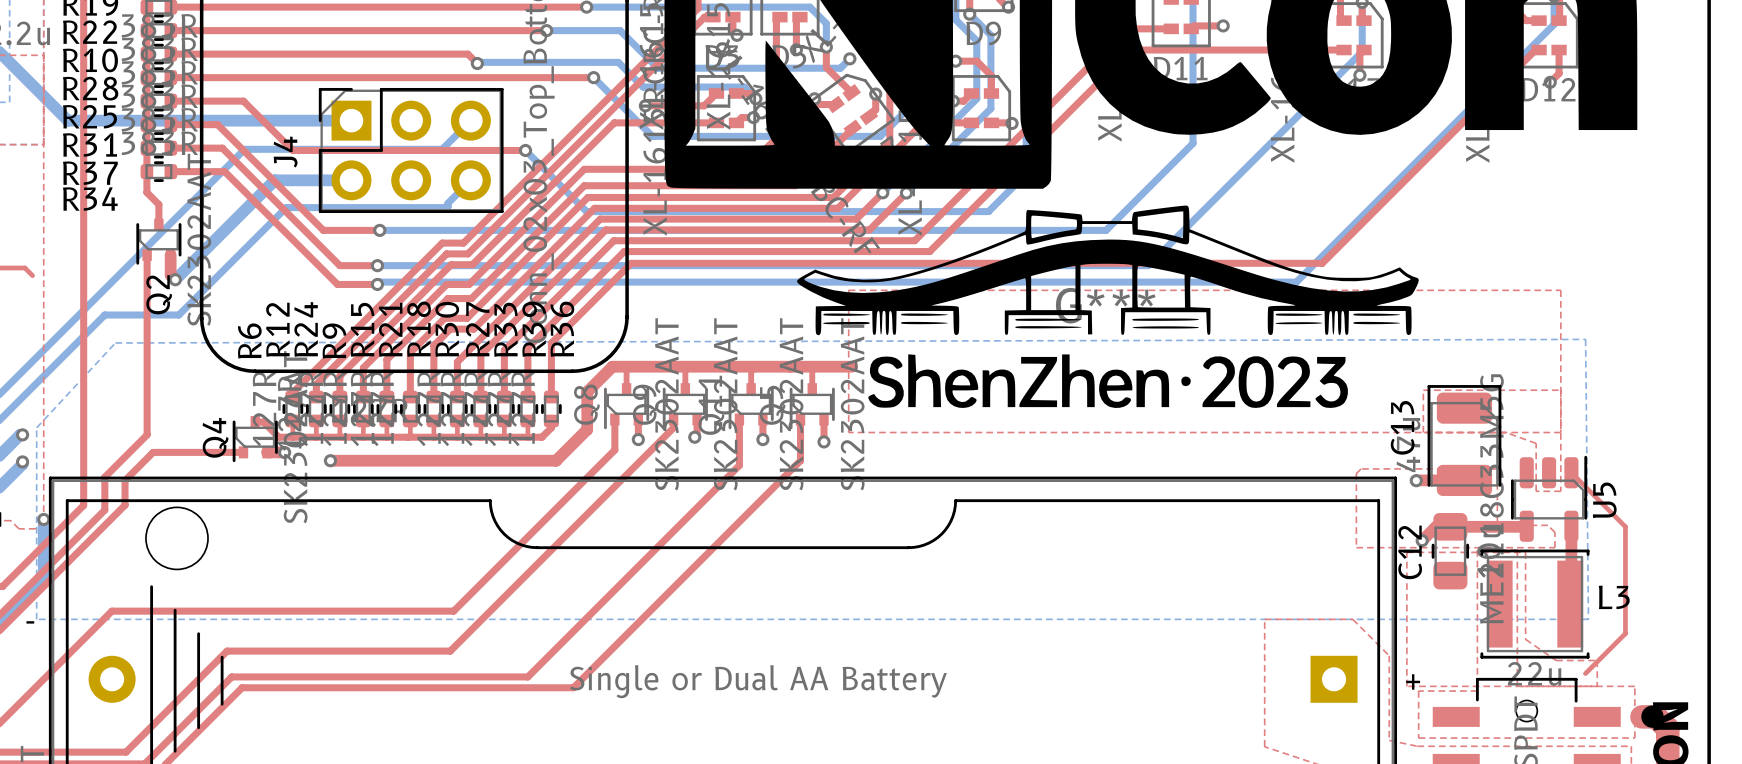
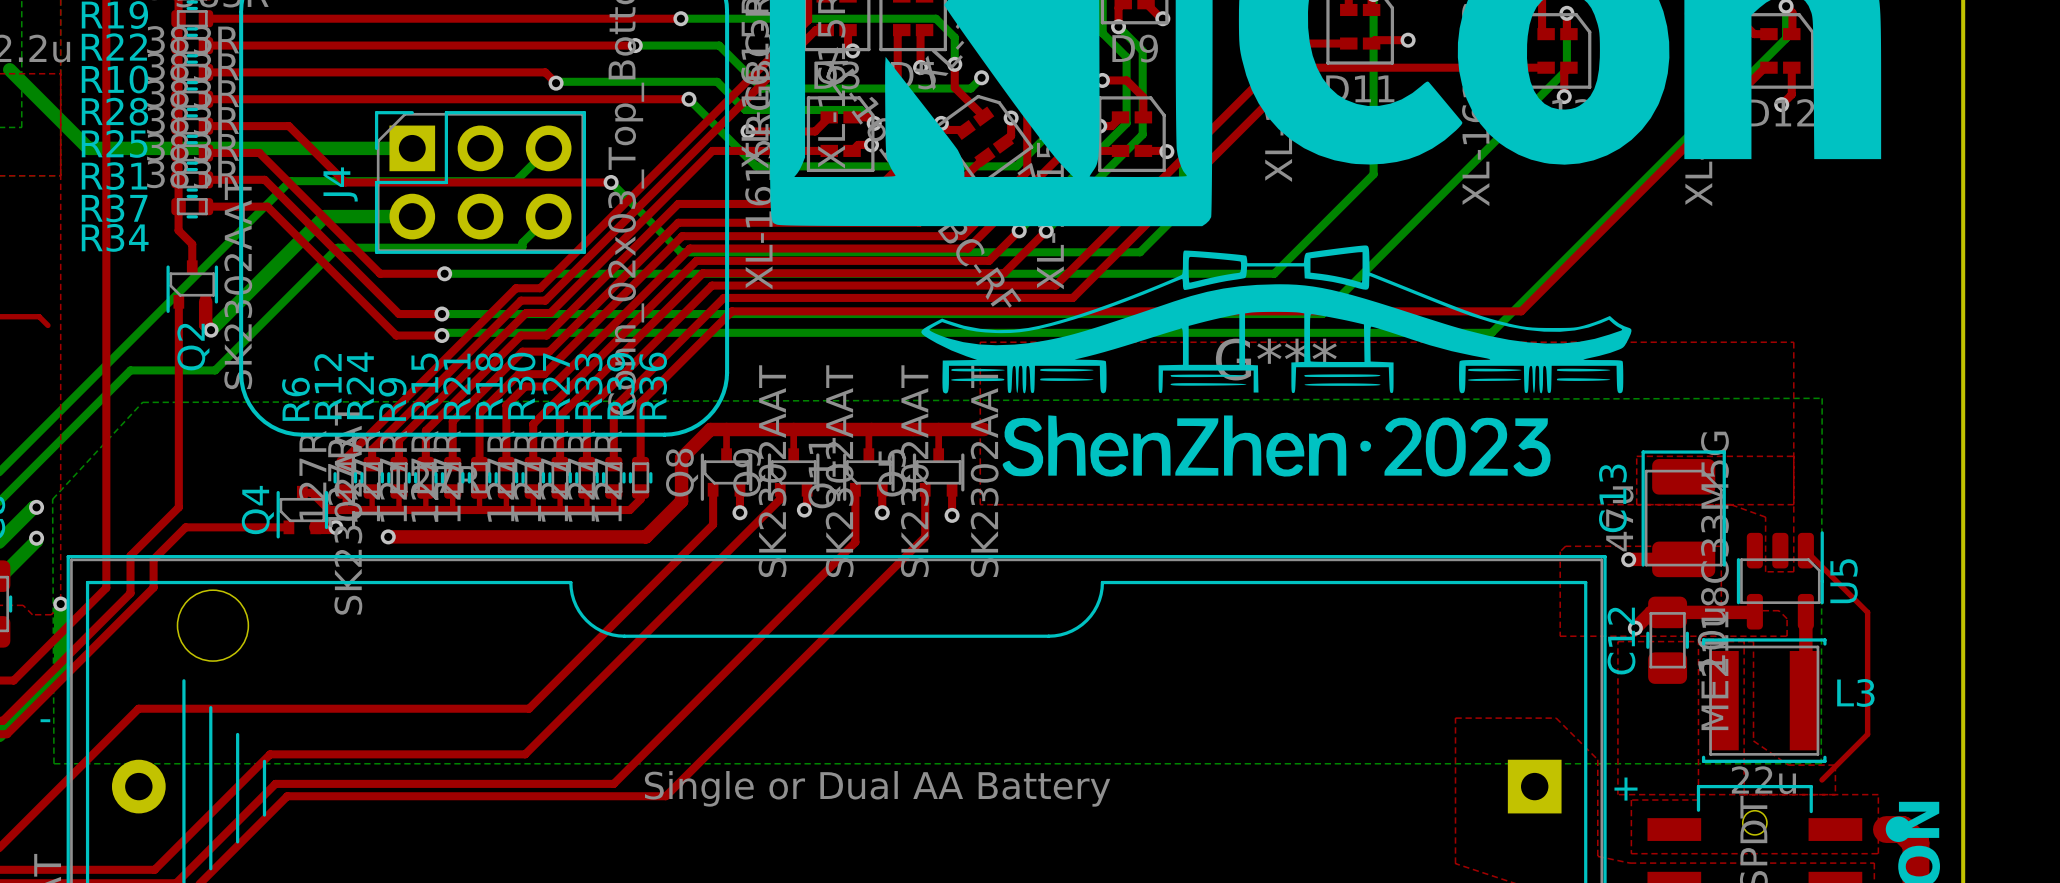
bottom zone outline: (1585, 339) (1588, 619) (36, 619) (36, 427) -> (1822, 398) (1821, 763) (53, 763) (52, 499)

